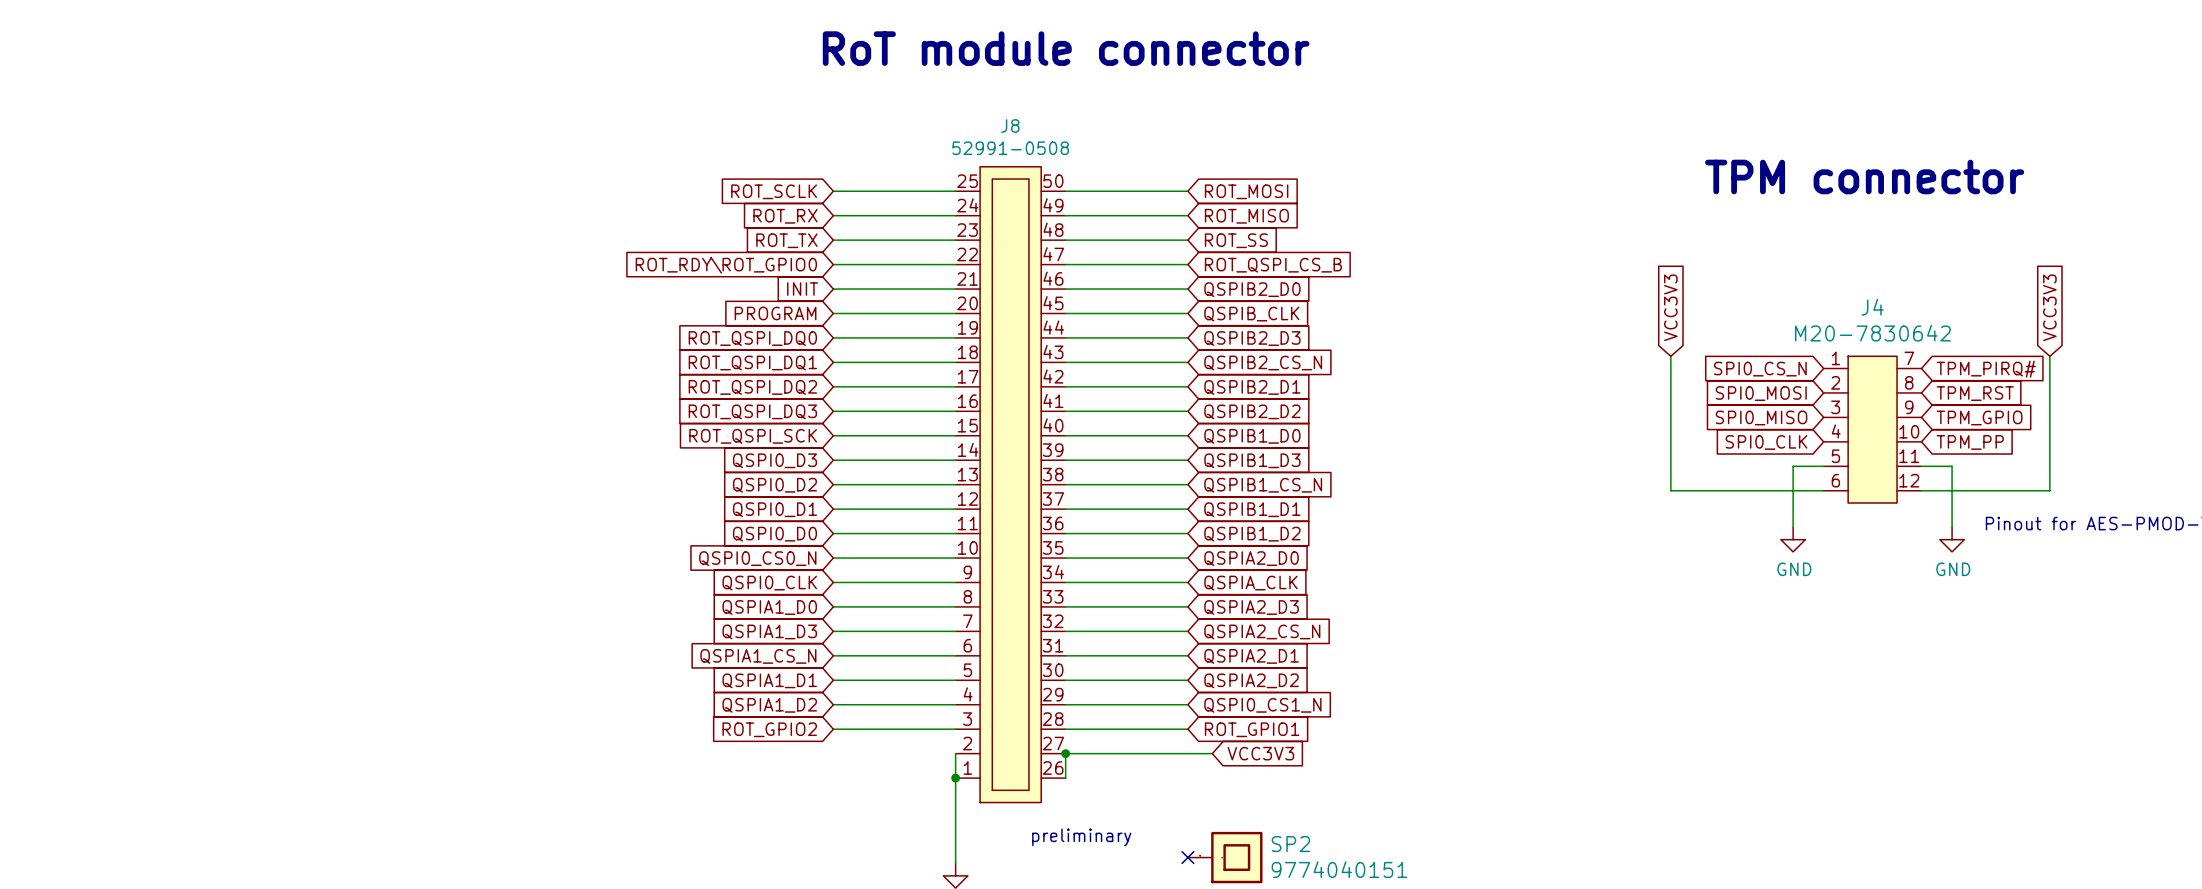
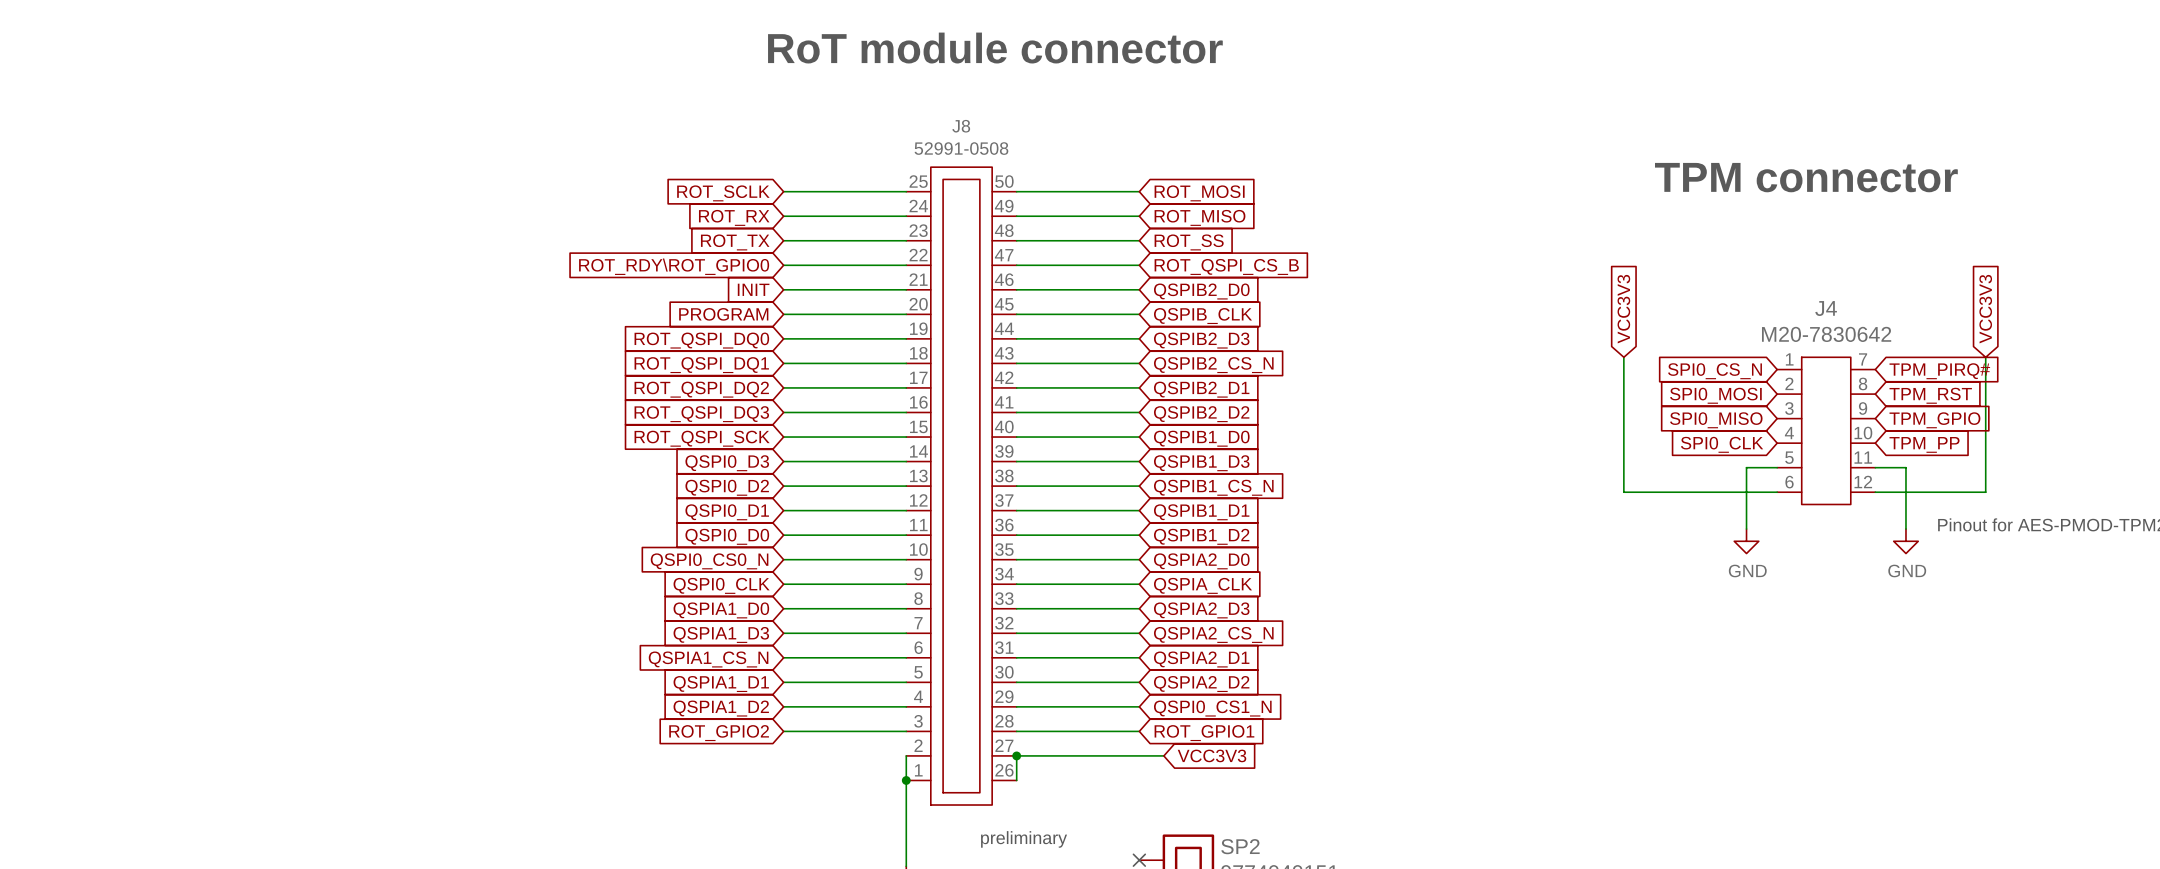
global label position: VCC3V3 (2049, 307) -> VCC3V3 (1985, 309)
wire: (2049, 356) (2049, 490) (2031, 490) -> (1985, 357) (1985, 492)

